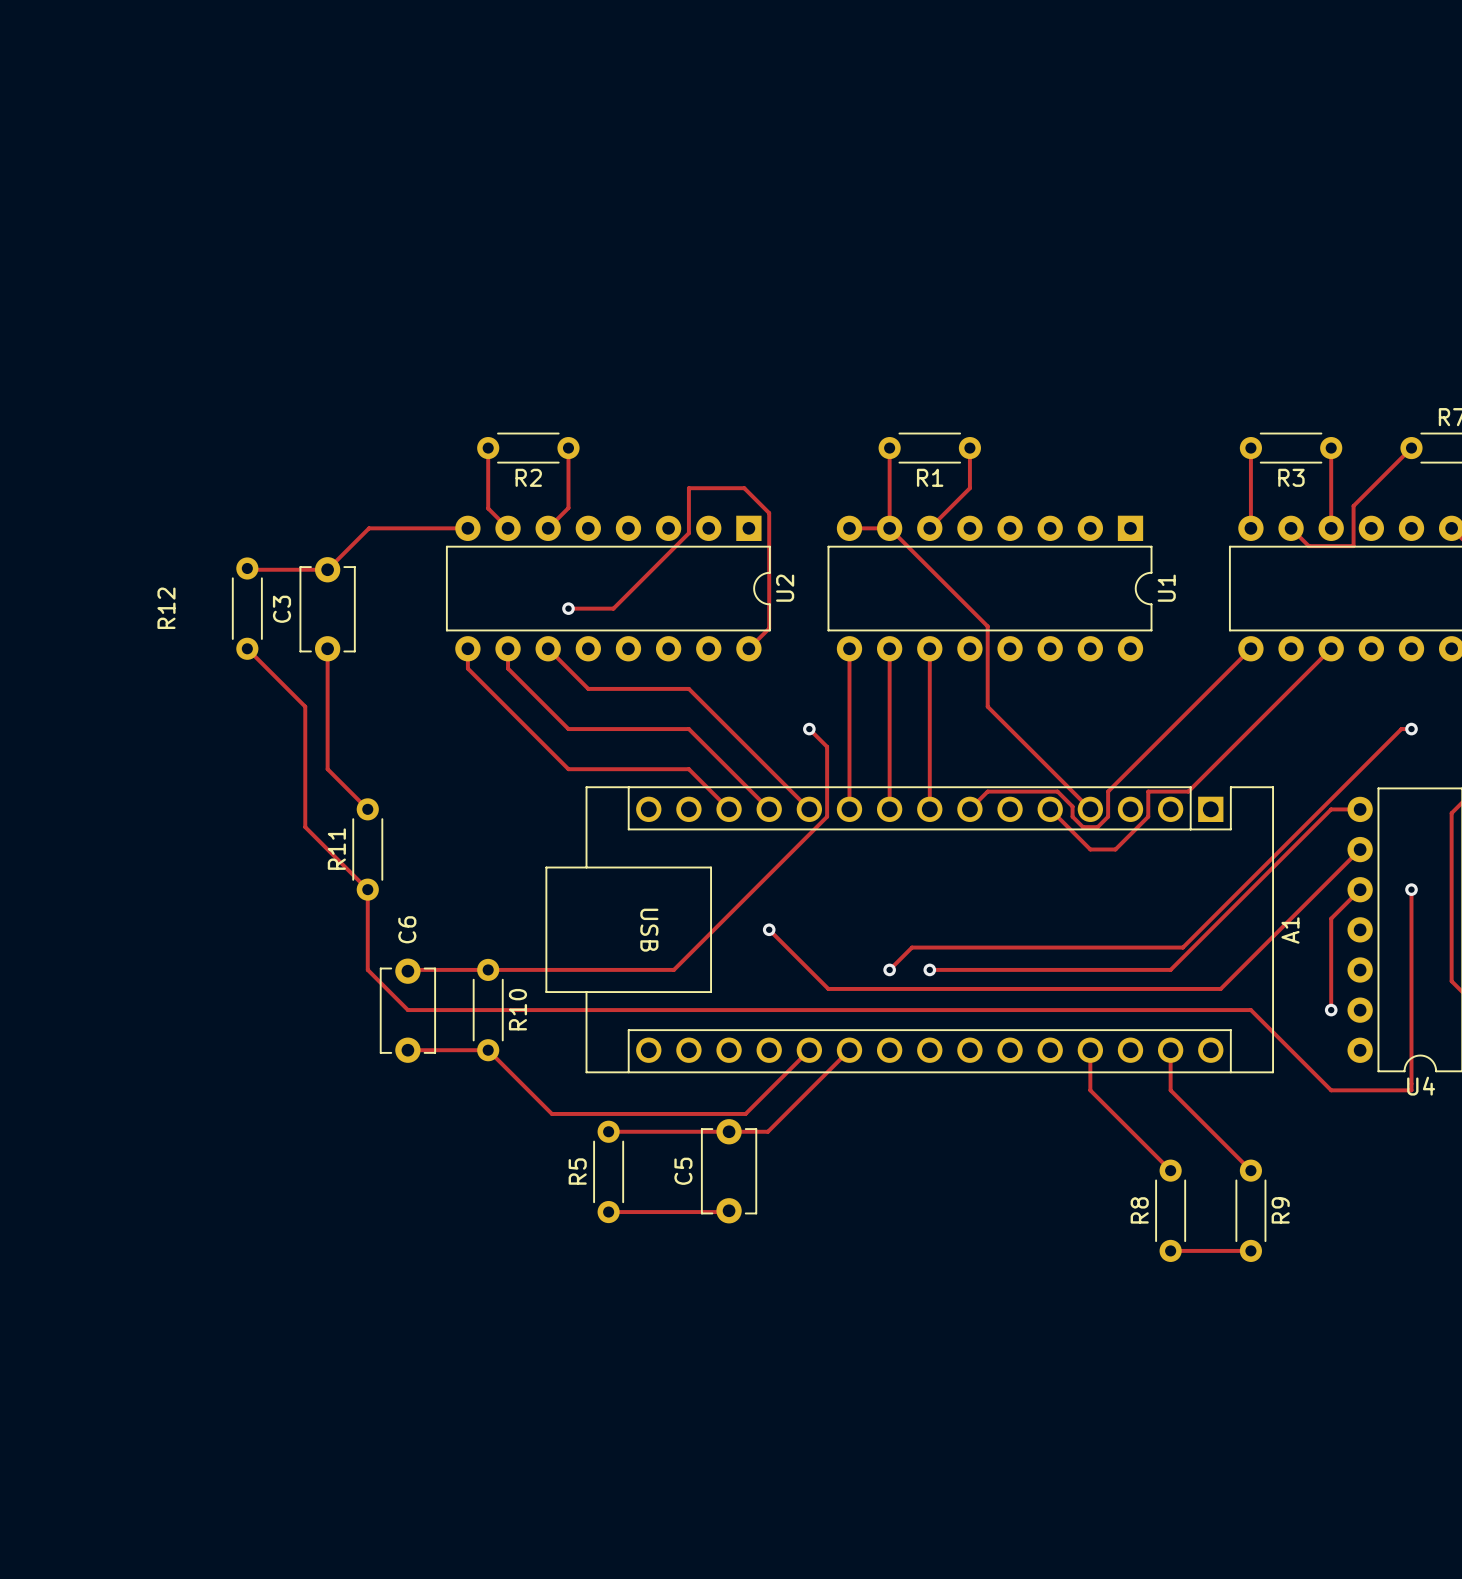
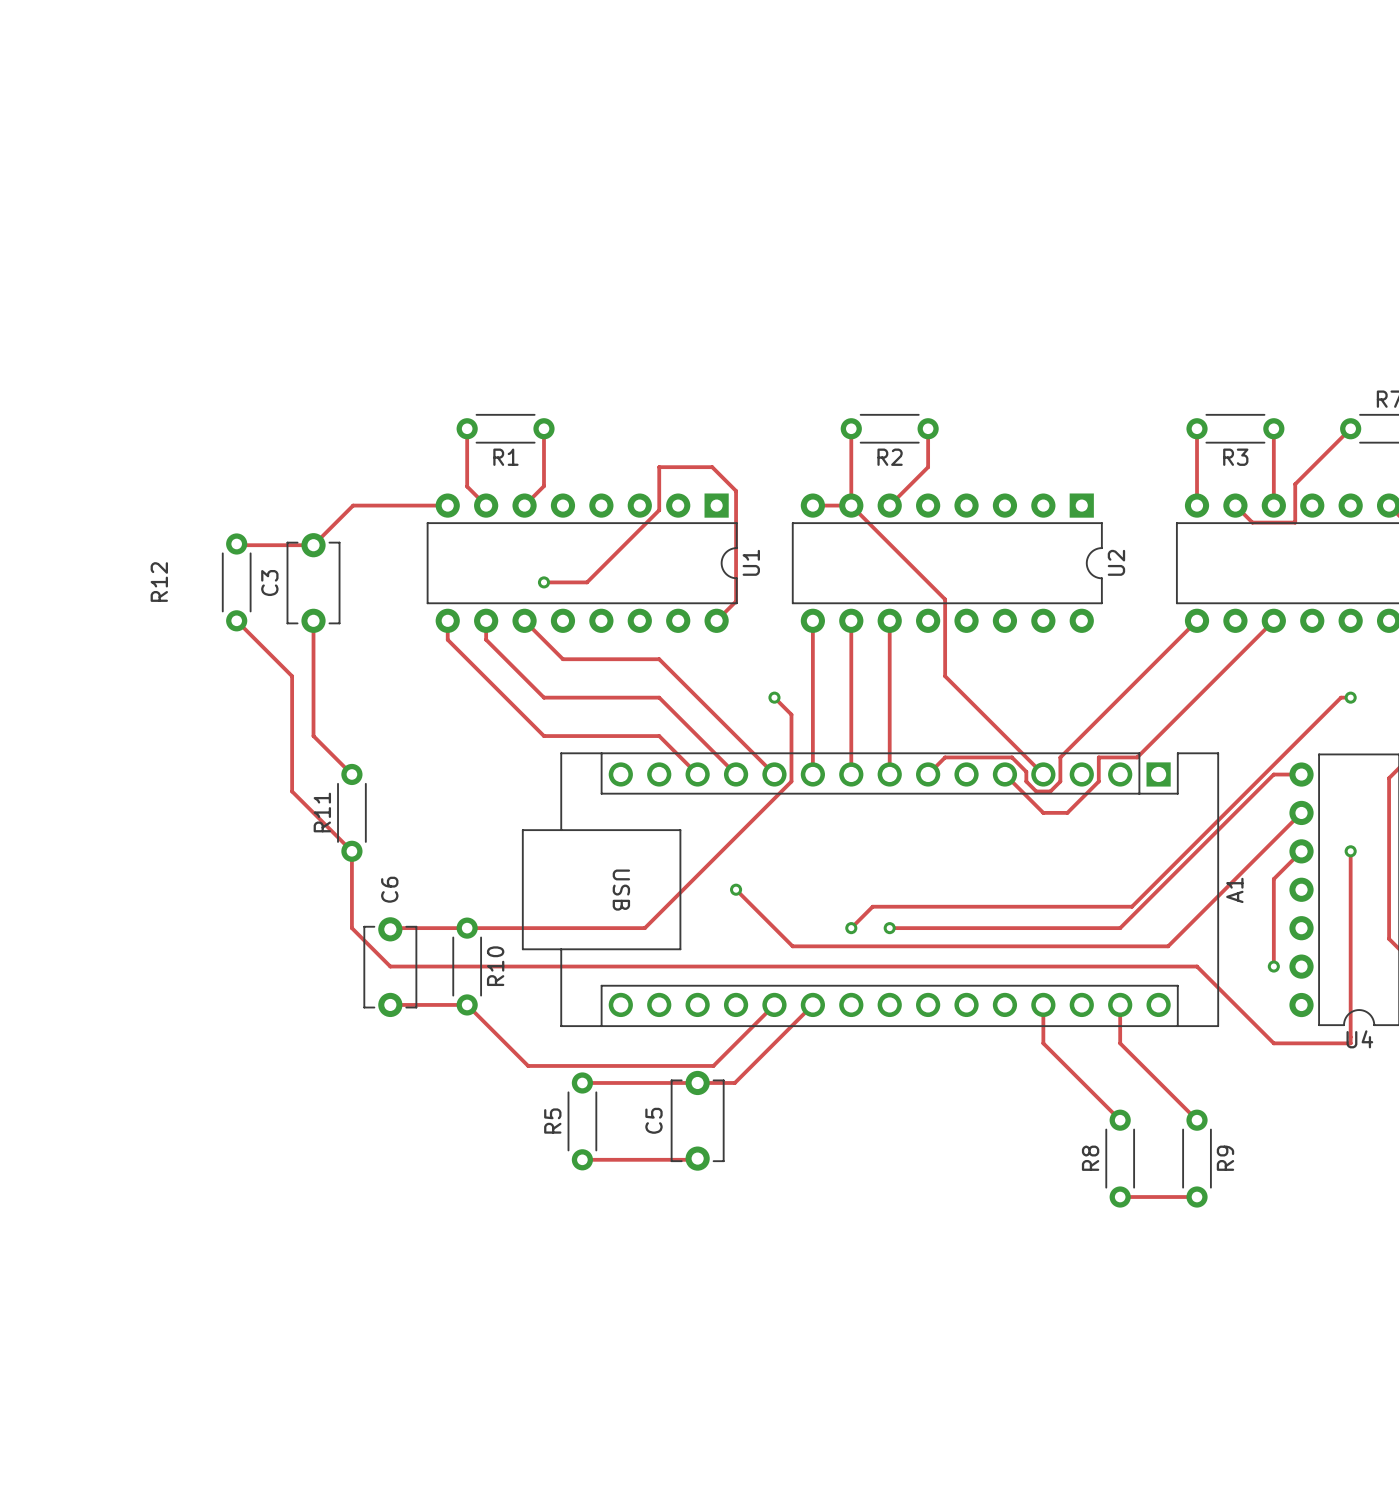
R2 name: R2 (528, 477) -> R1 (505, 457)
R1 name: R1 (930, 477) -> R2 (890, 457)
U2 name: U2 (785, 588) -> U1 (751, 562)
U1 name: U1 (1166, 588) -> U2 (1116, 562)

